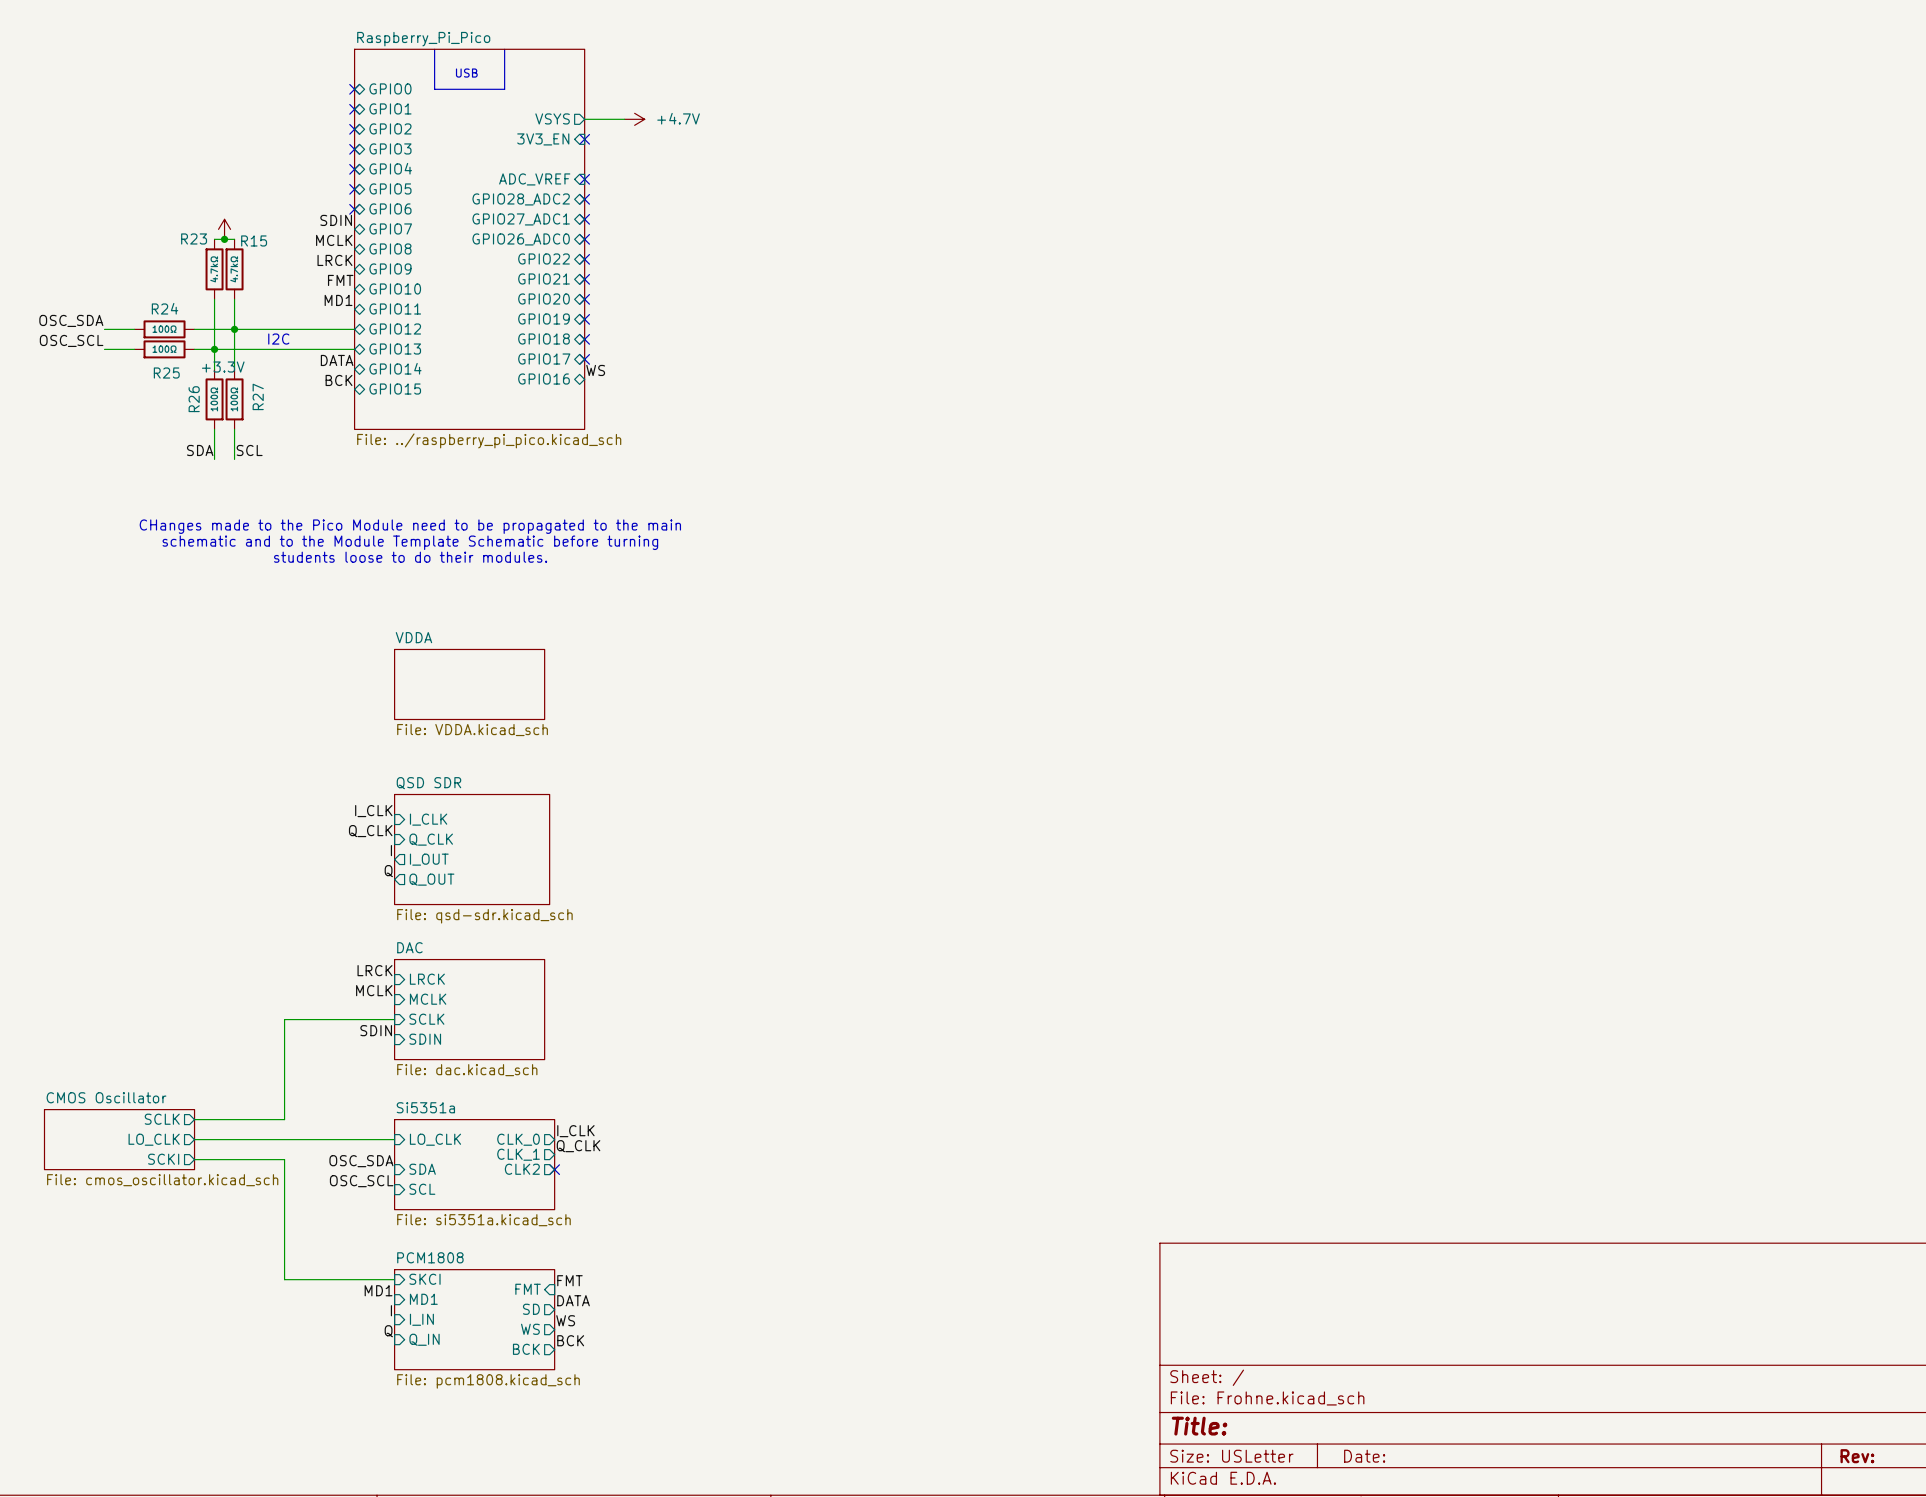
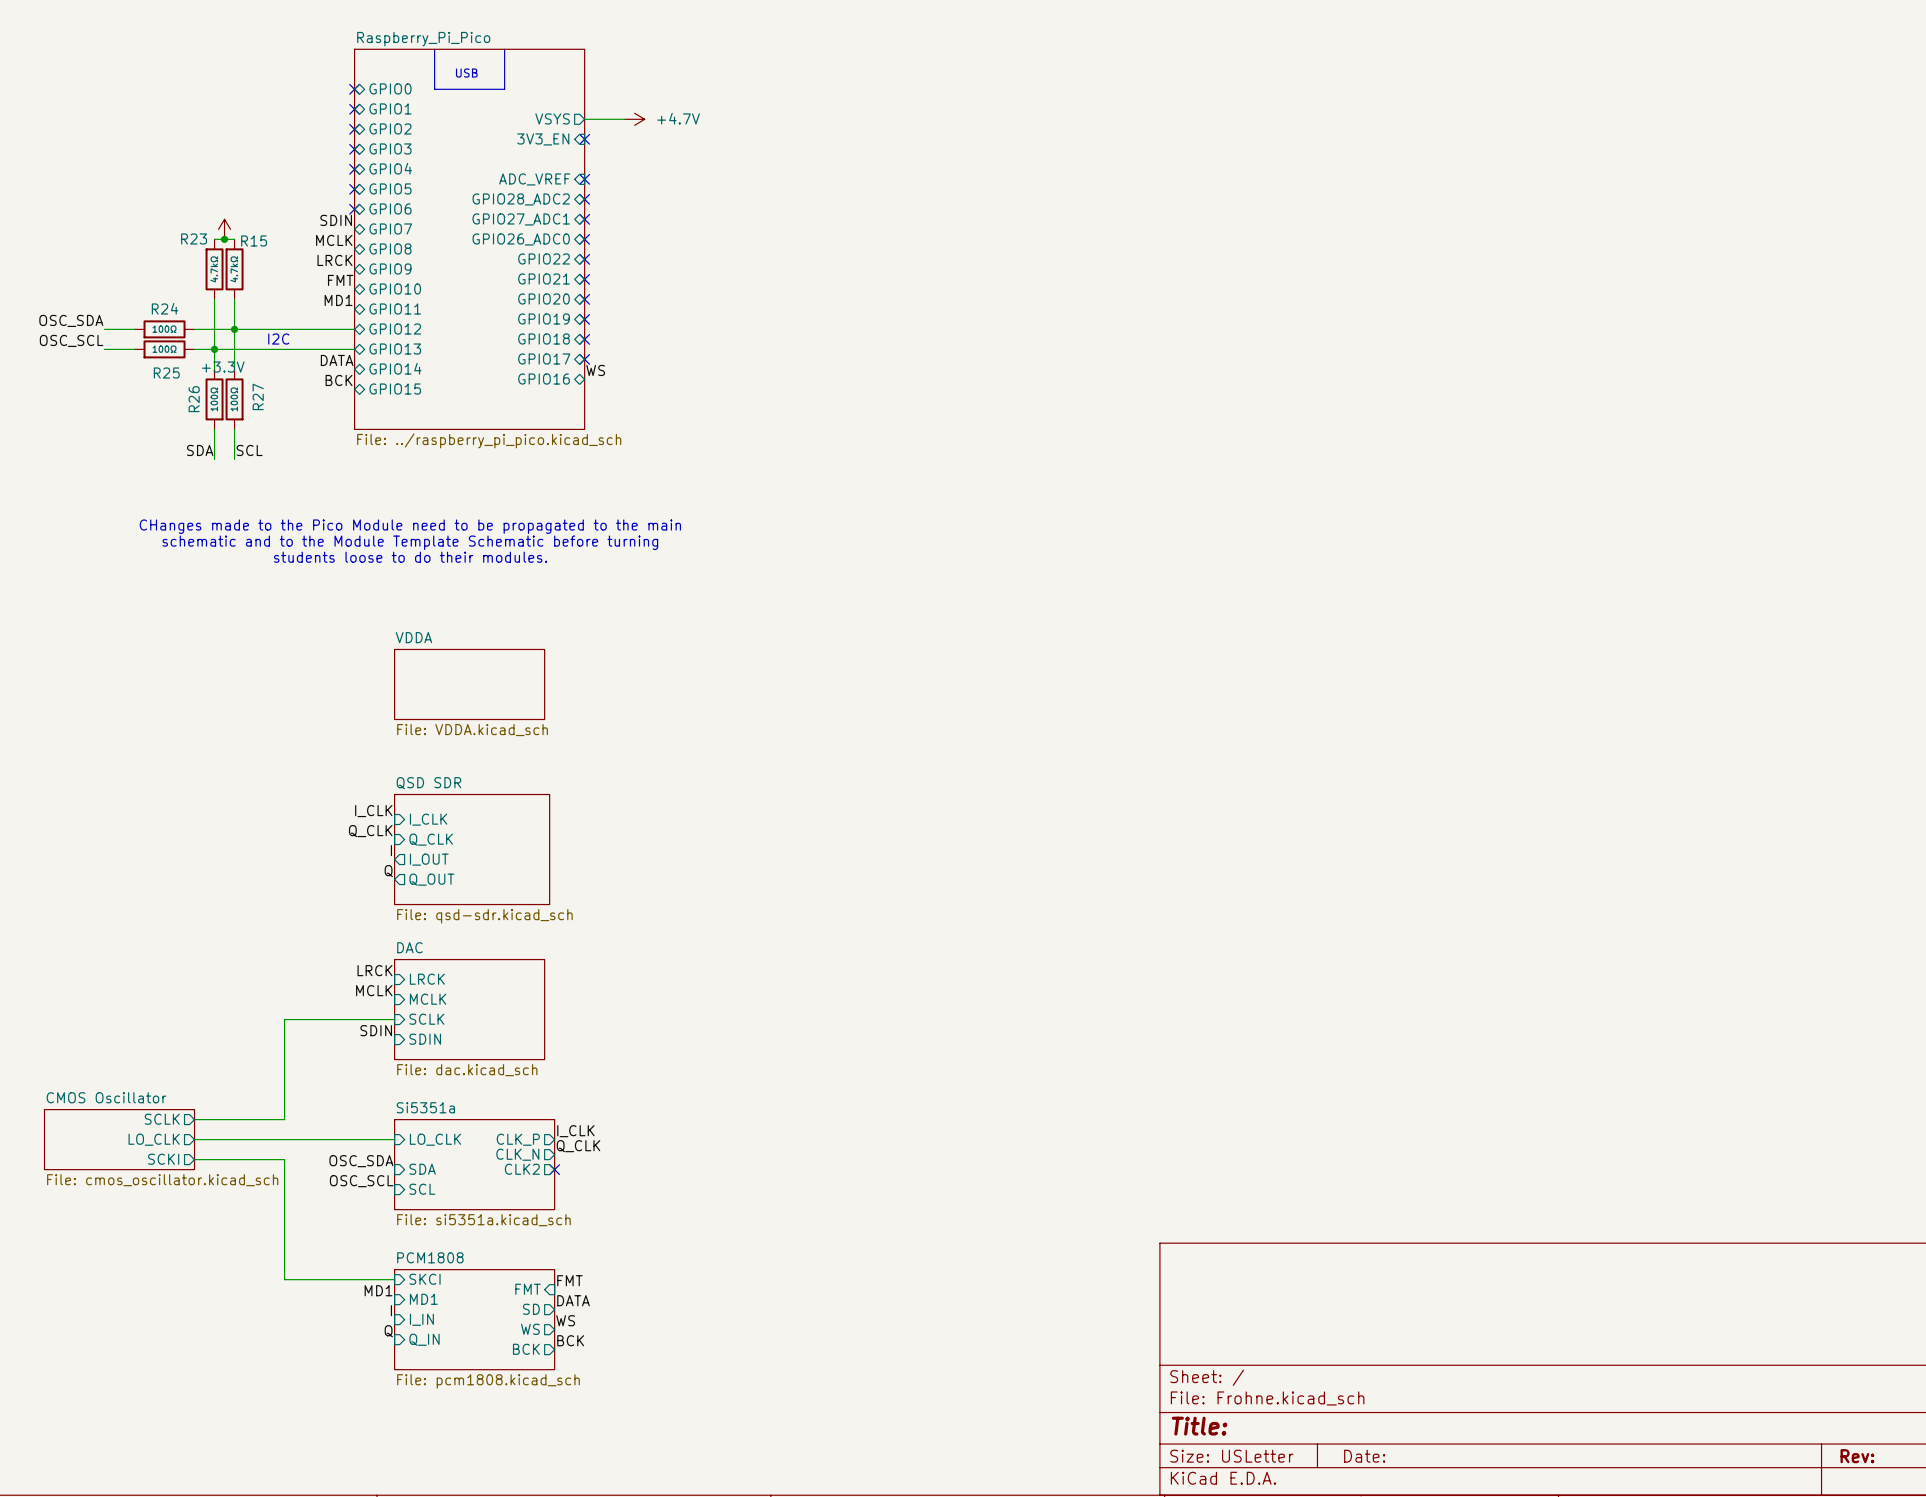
sheet pin: CLK_0 (518, 1139) -> CLK_P (518, 1139)
sheet pin: CLK_1 (518, 1154) -> CLK_N (517, 1154)

